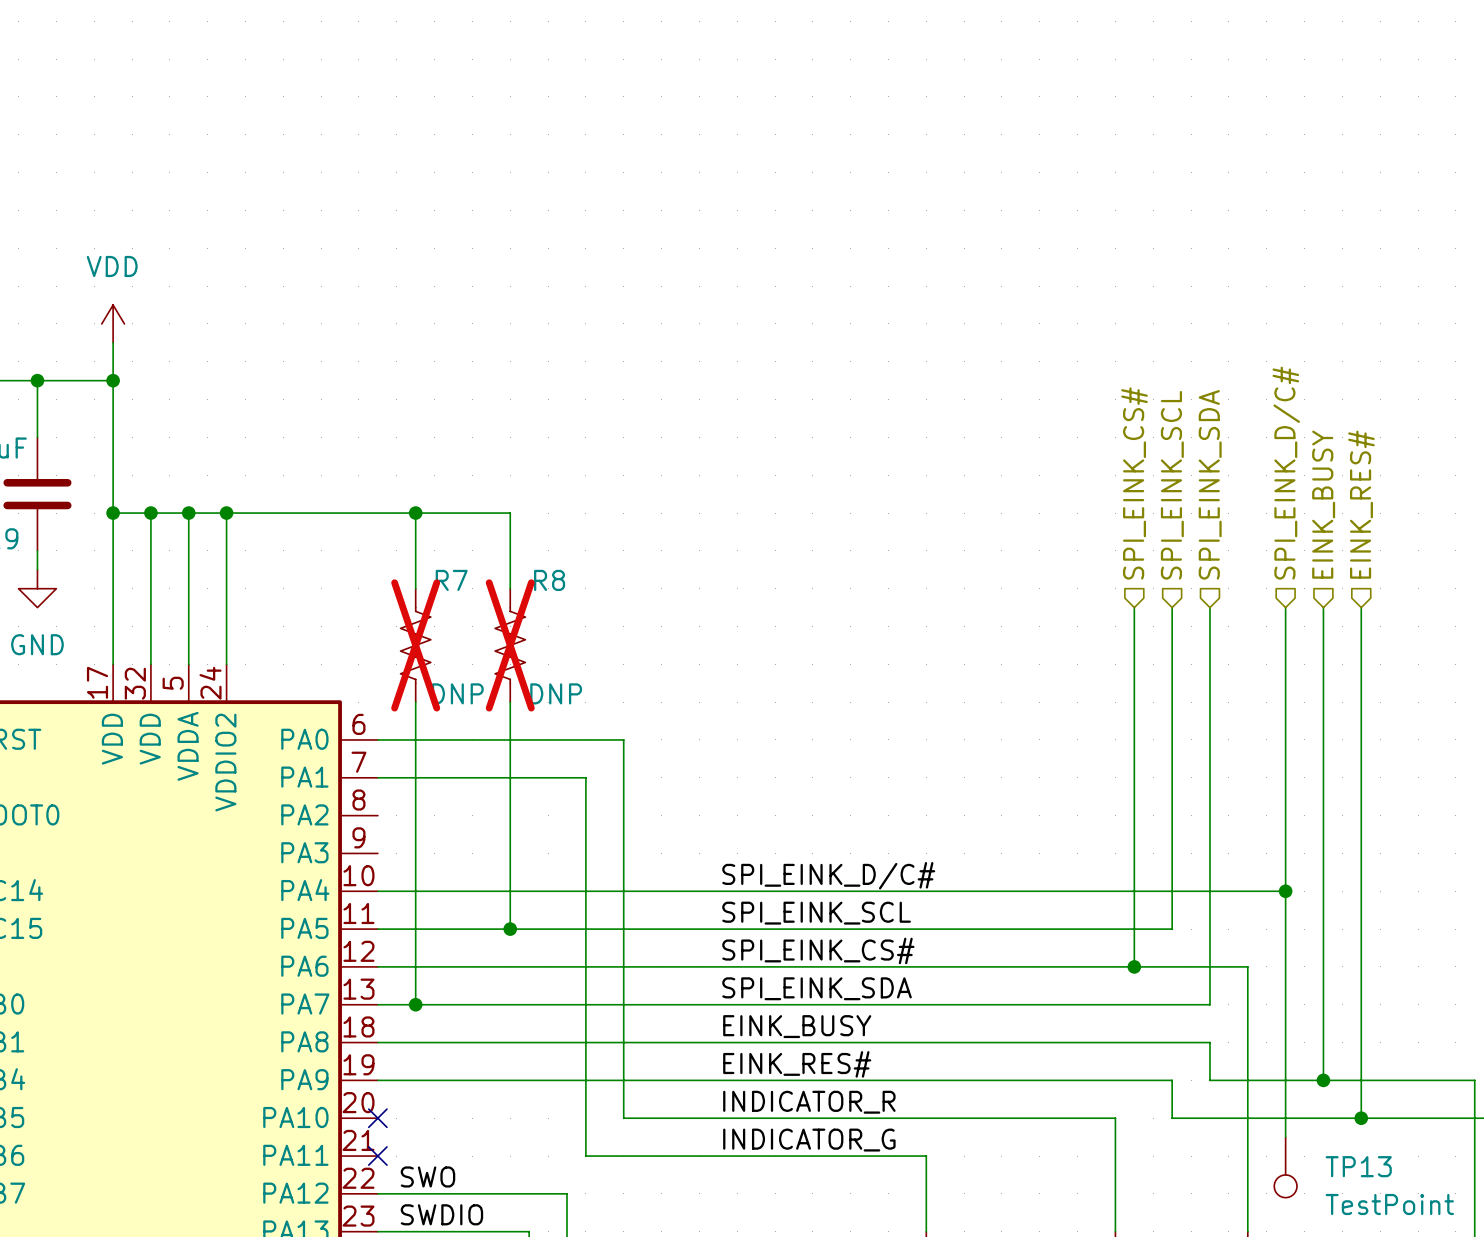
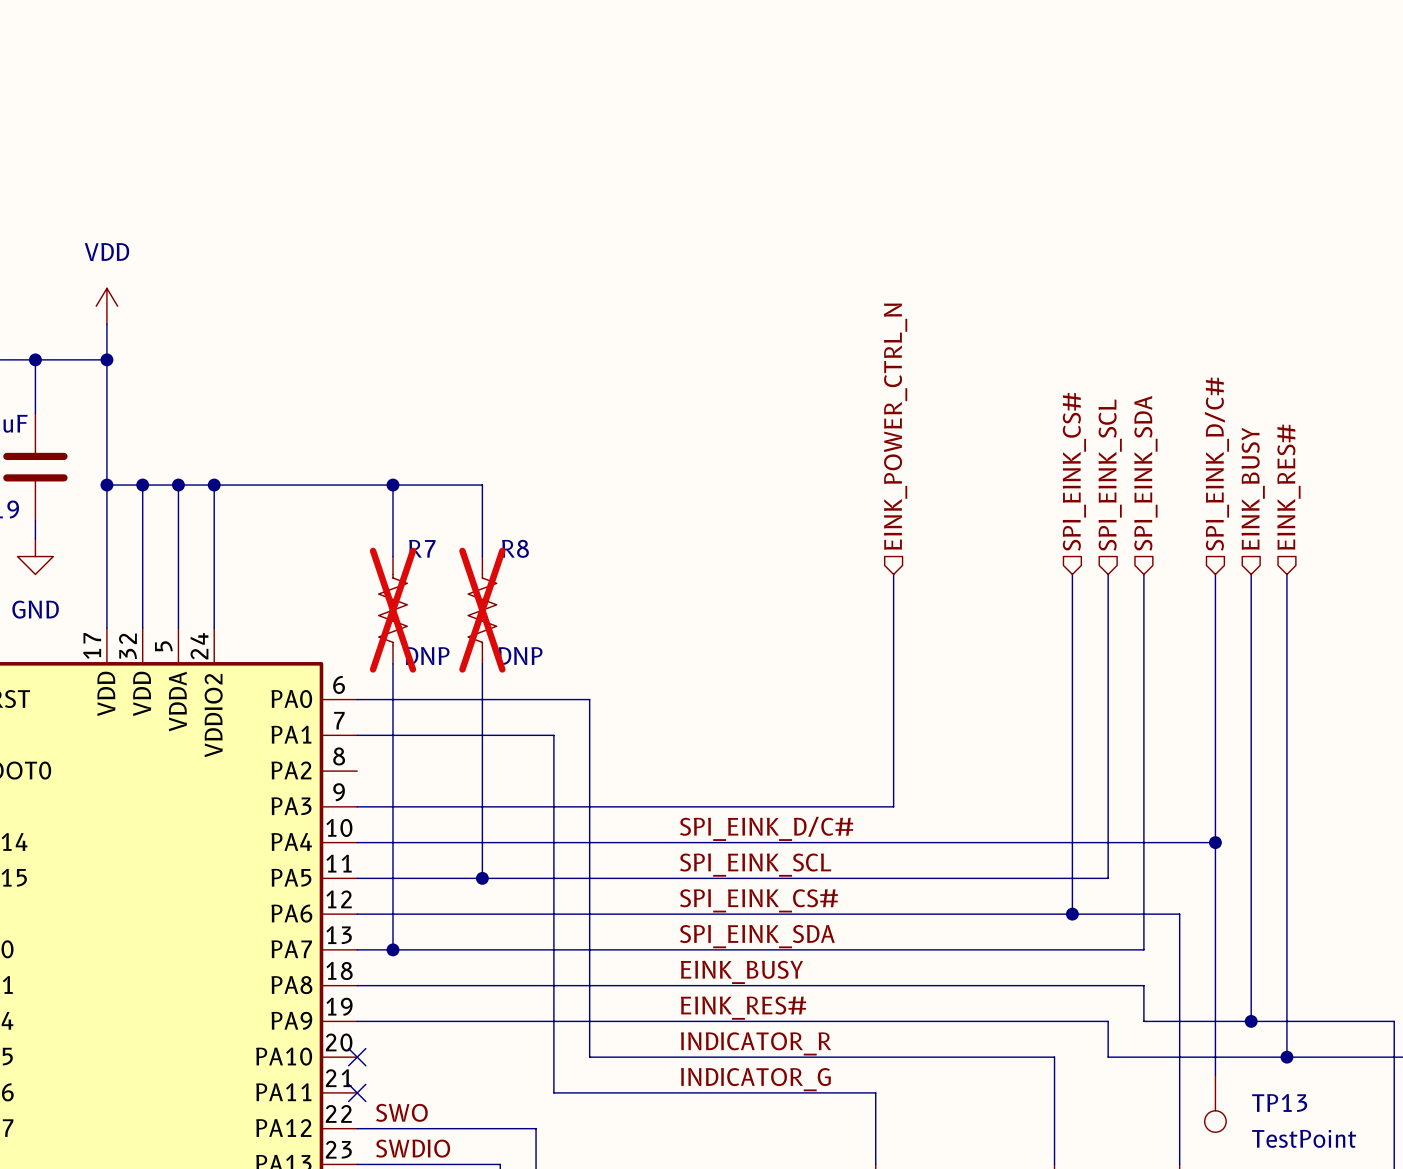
hierarchical label: none -> EINK_POWER_CTRL_N (895, 426)
wire: none -> (893, 574) (893, 806) (357, 806)

